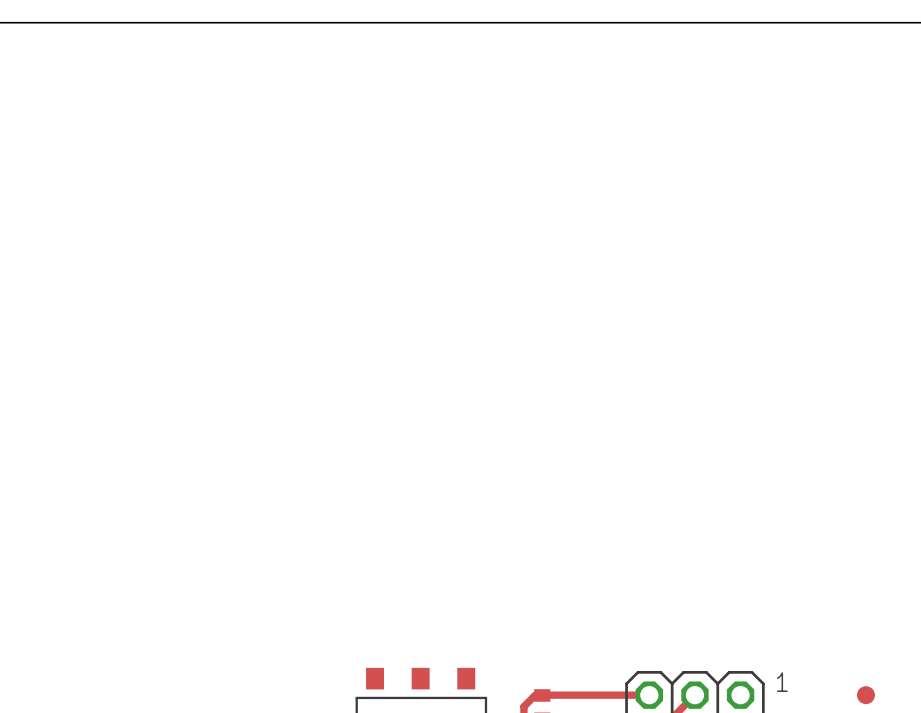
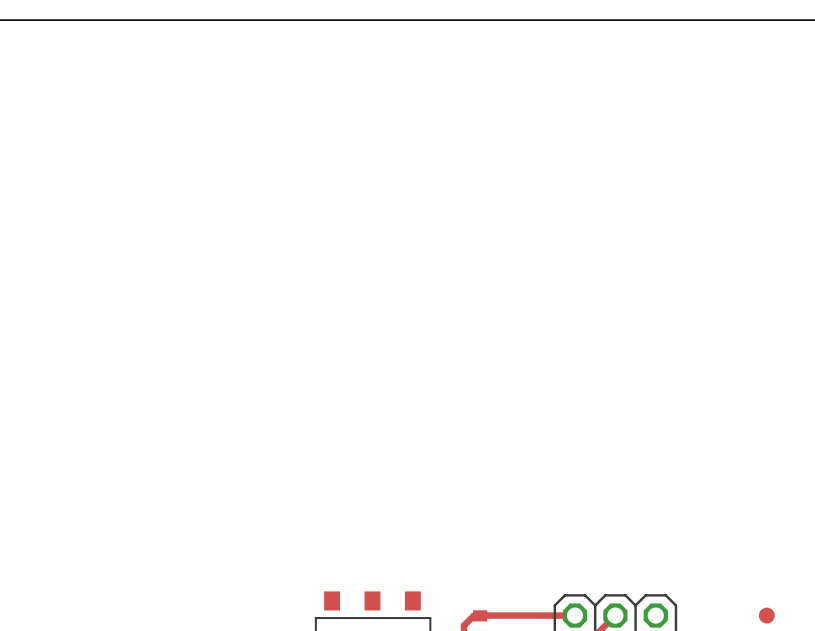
text: 1 (782, 682) -> none

